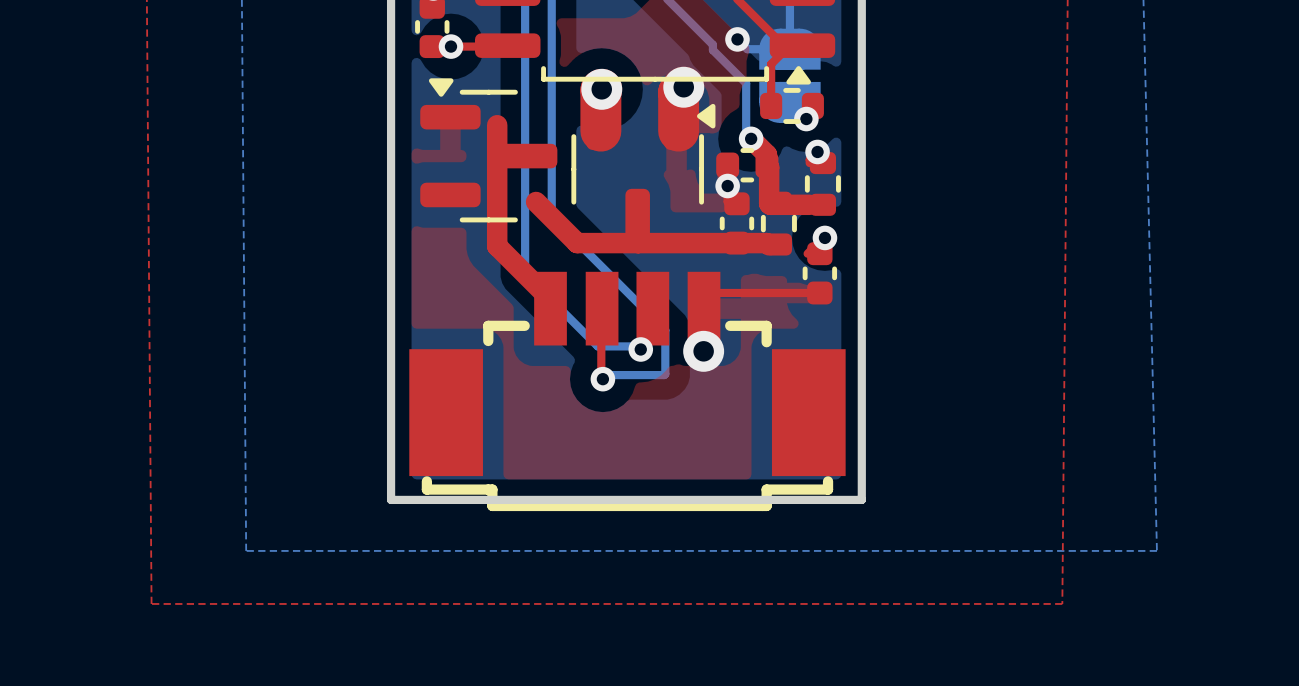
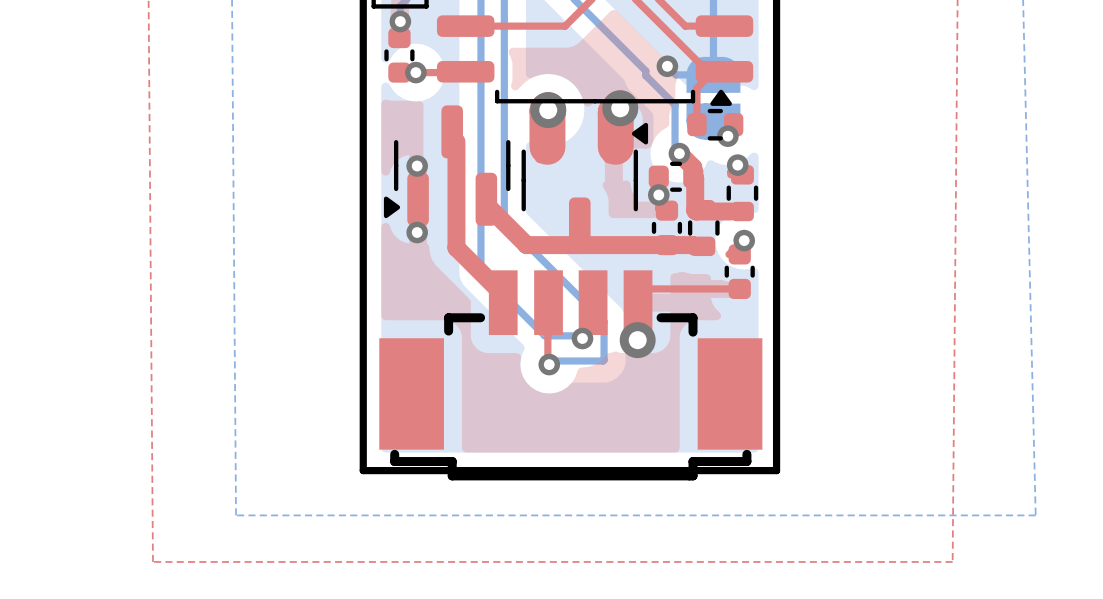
part rotation: 0° (488, 150) -> 90° counterclockwise (447, 165)
via: none -> (417, 166)
via: none -> (417, 232)

